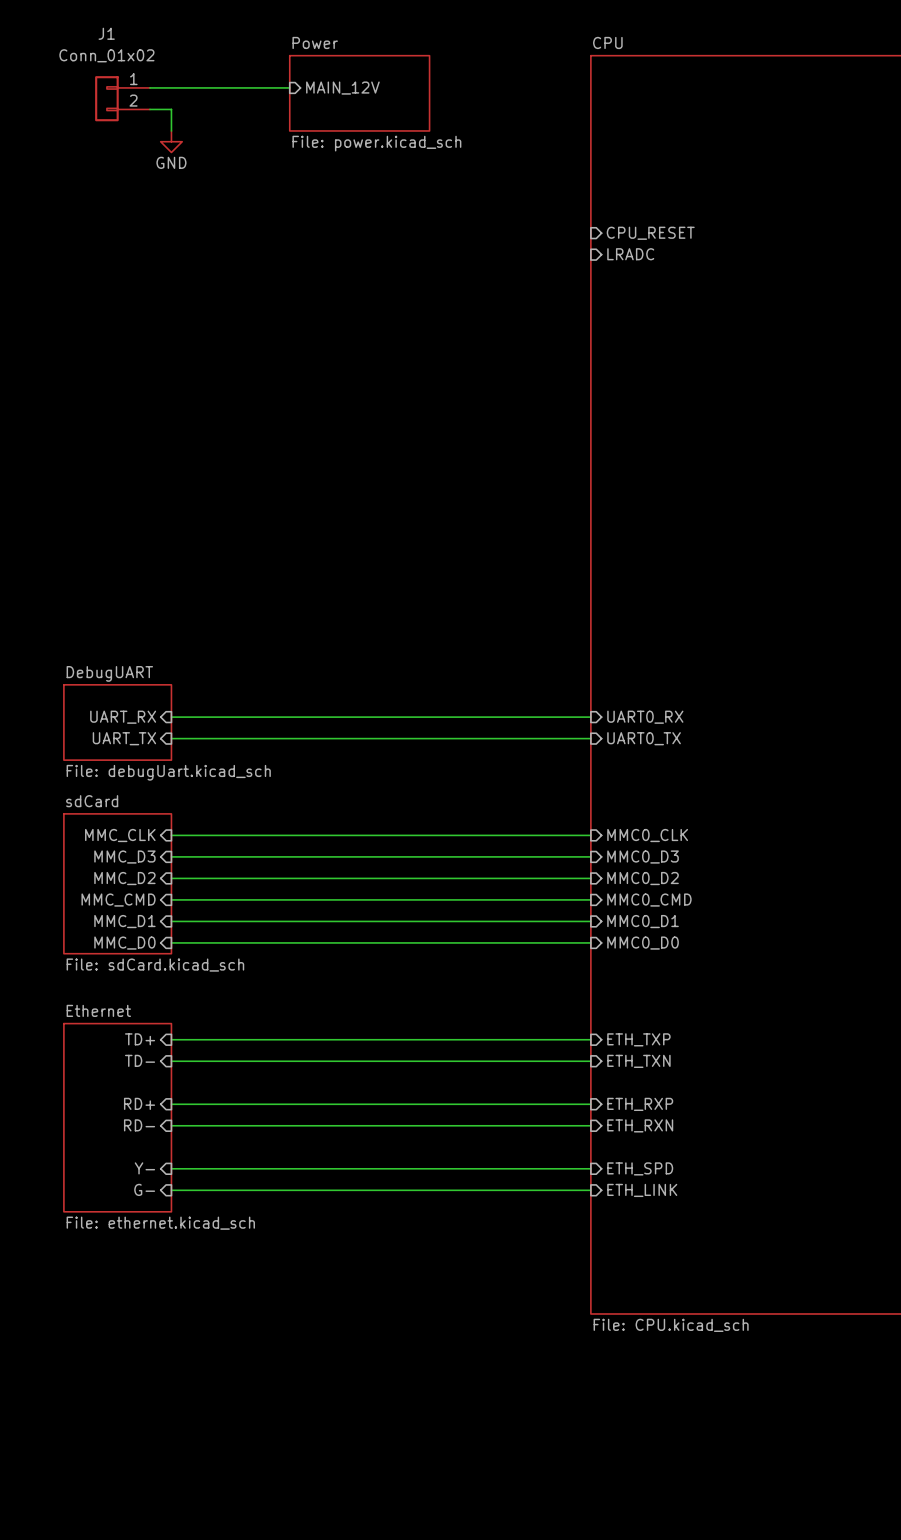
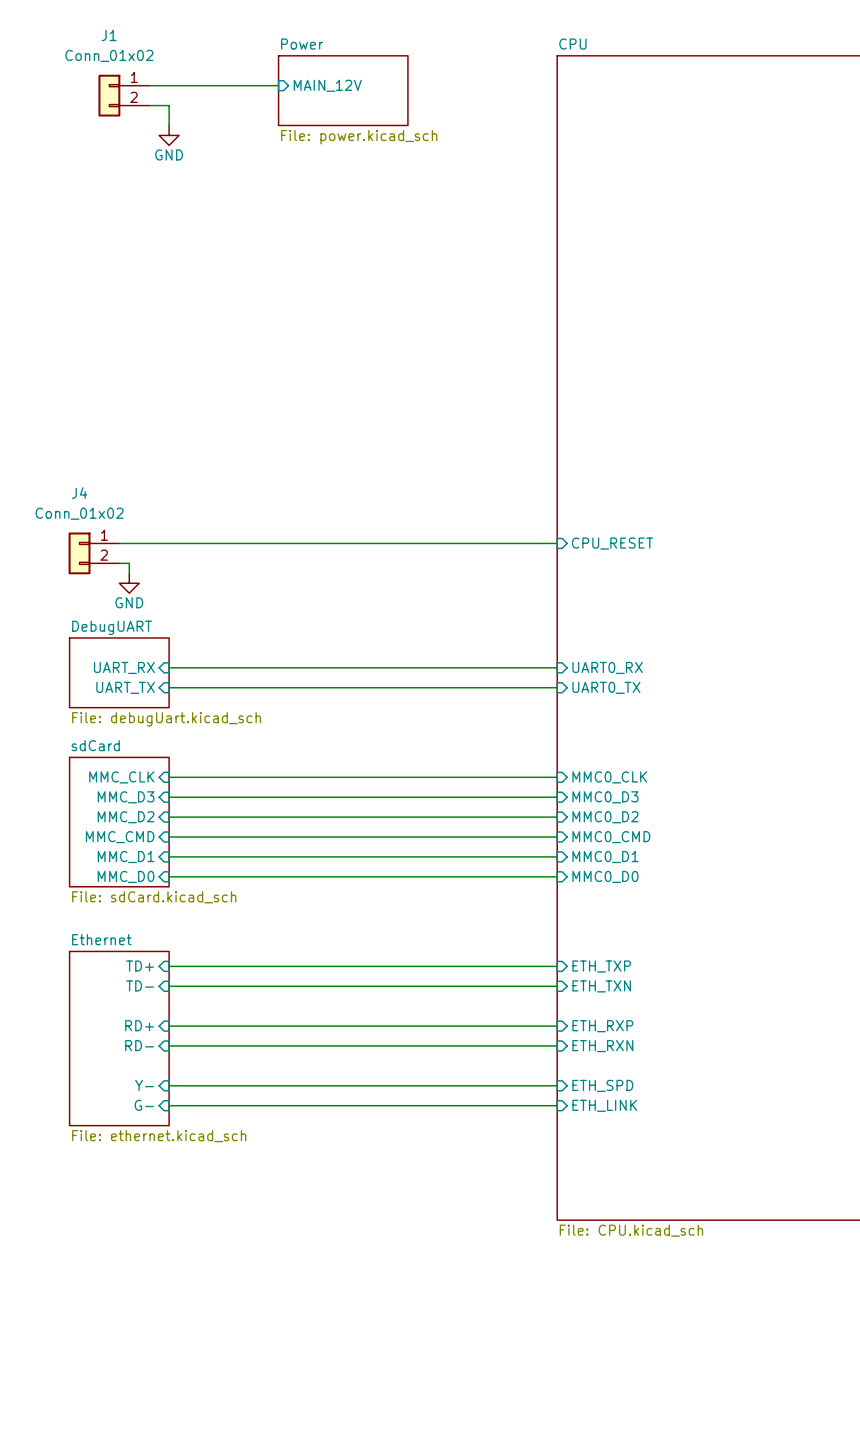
sheet pin: CPU_RESET (650, 233) -> none
sheet pin: LRADC (630, 254) -> none
wire: none -> (119, 543) (557, 543)
sheet pin: none -> CPU_RESET (612, 543)
J4: none -> Conn_01x02 (93, 553)
wire: none -> (119, 563) (129, 563) (129, 573)
power symbol: none -> GND (129, 583)

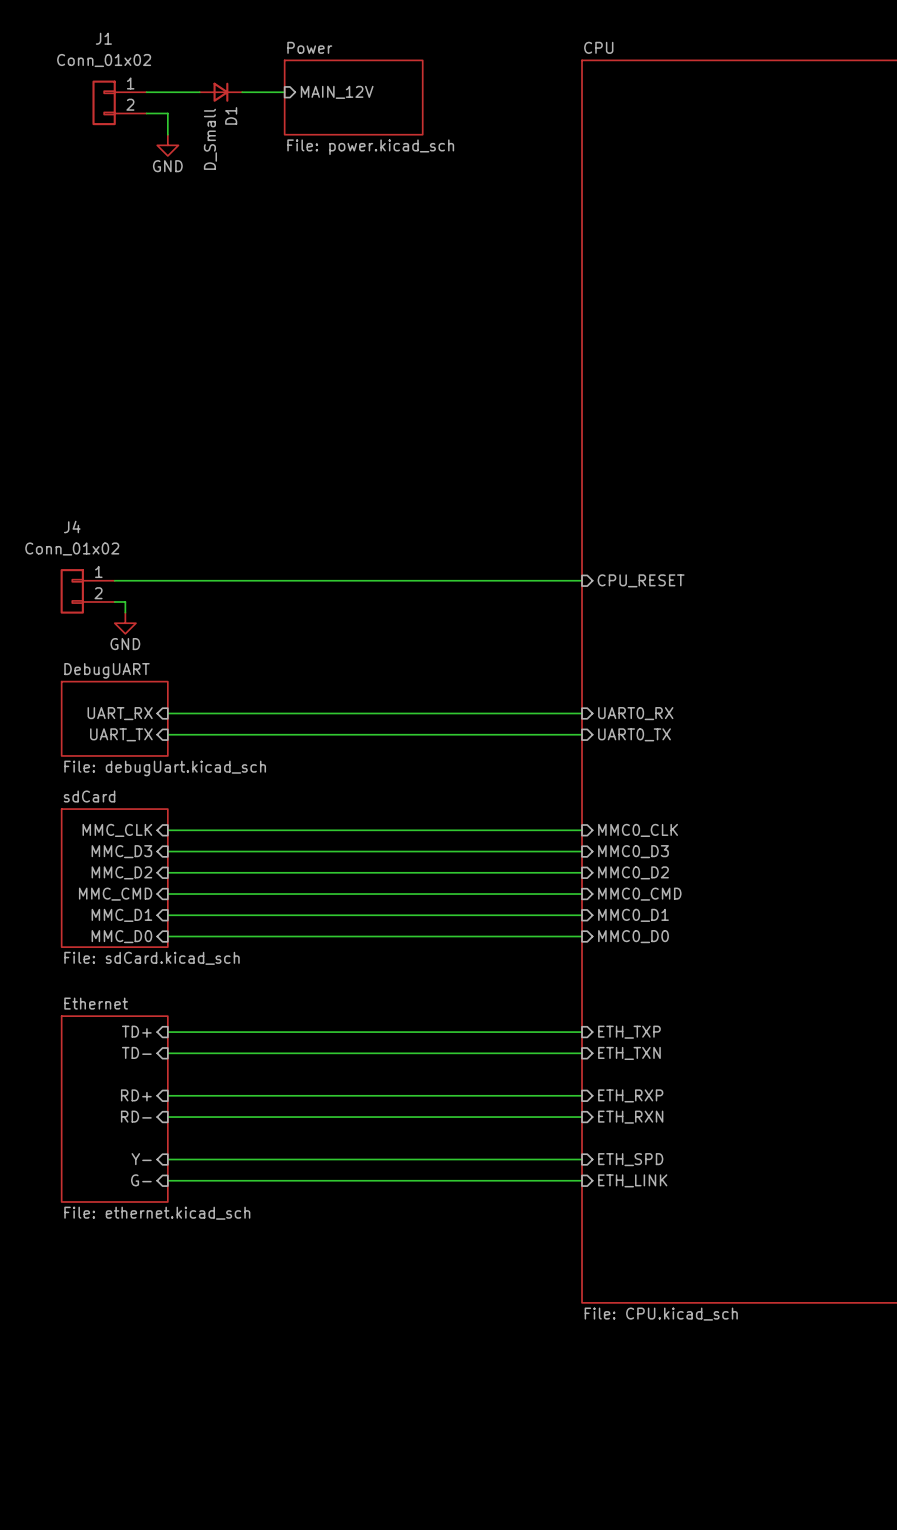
D1: none -> D_Small (220, 92)

